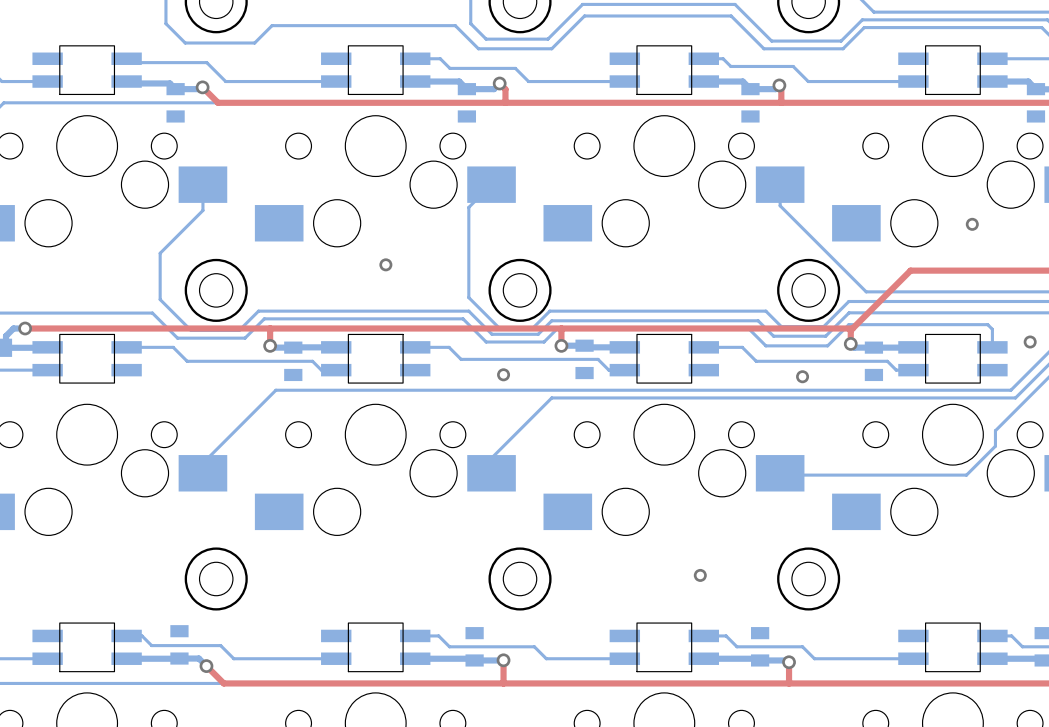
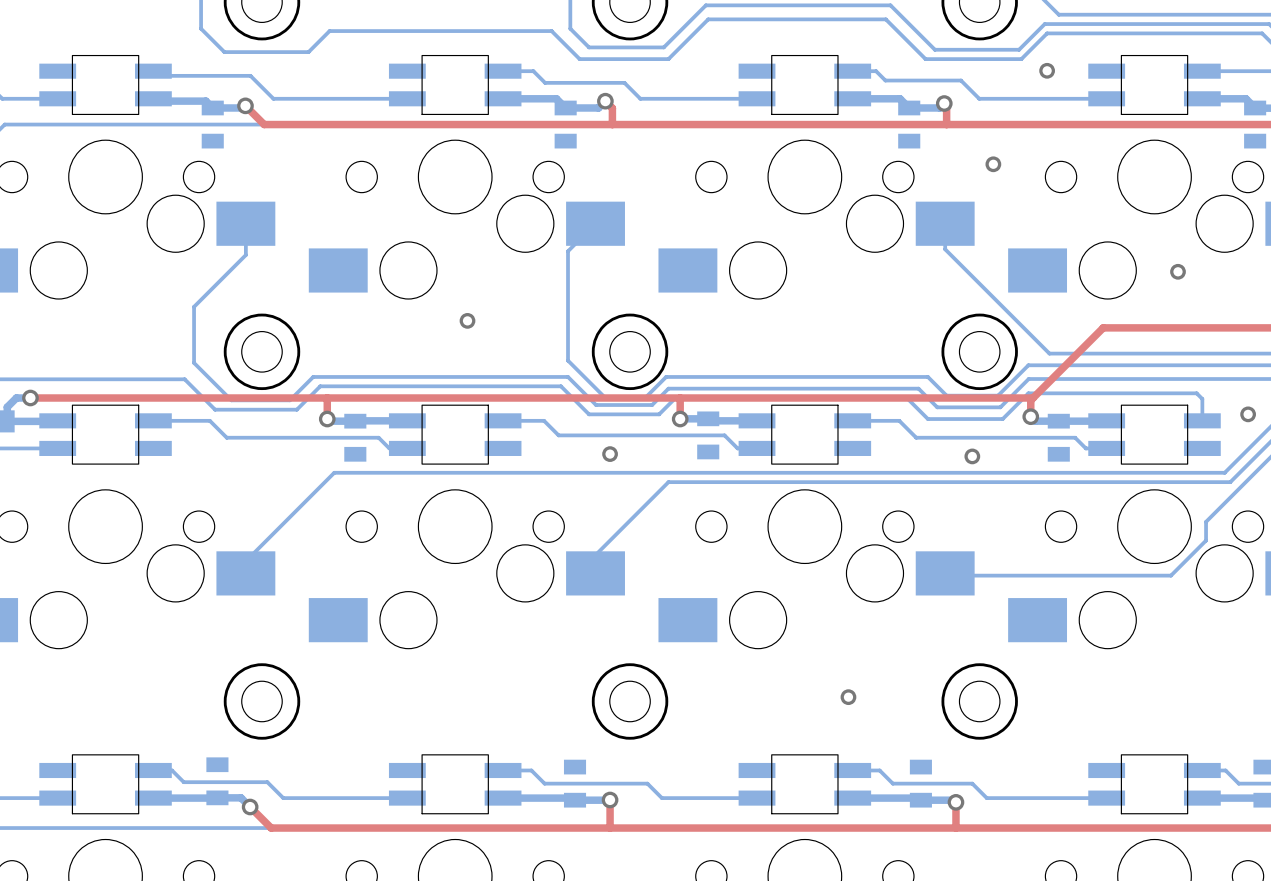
via: none -> (1047, 70)
via: none -> (993, 164)

